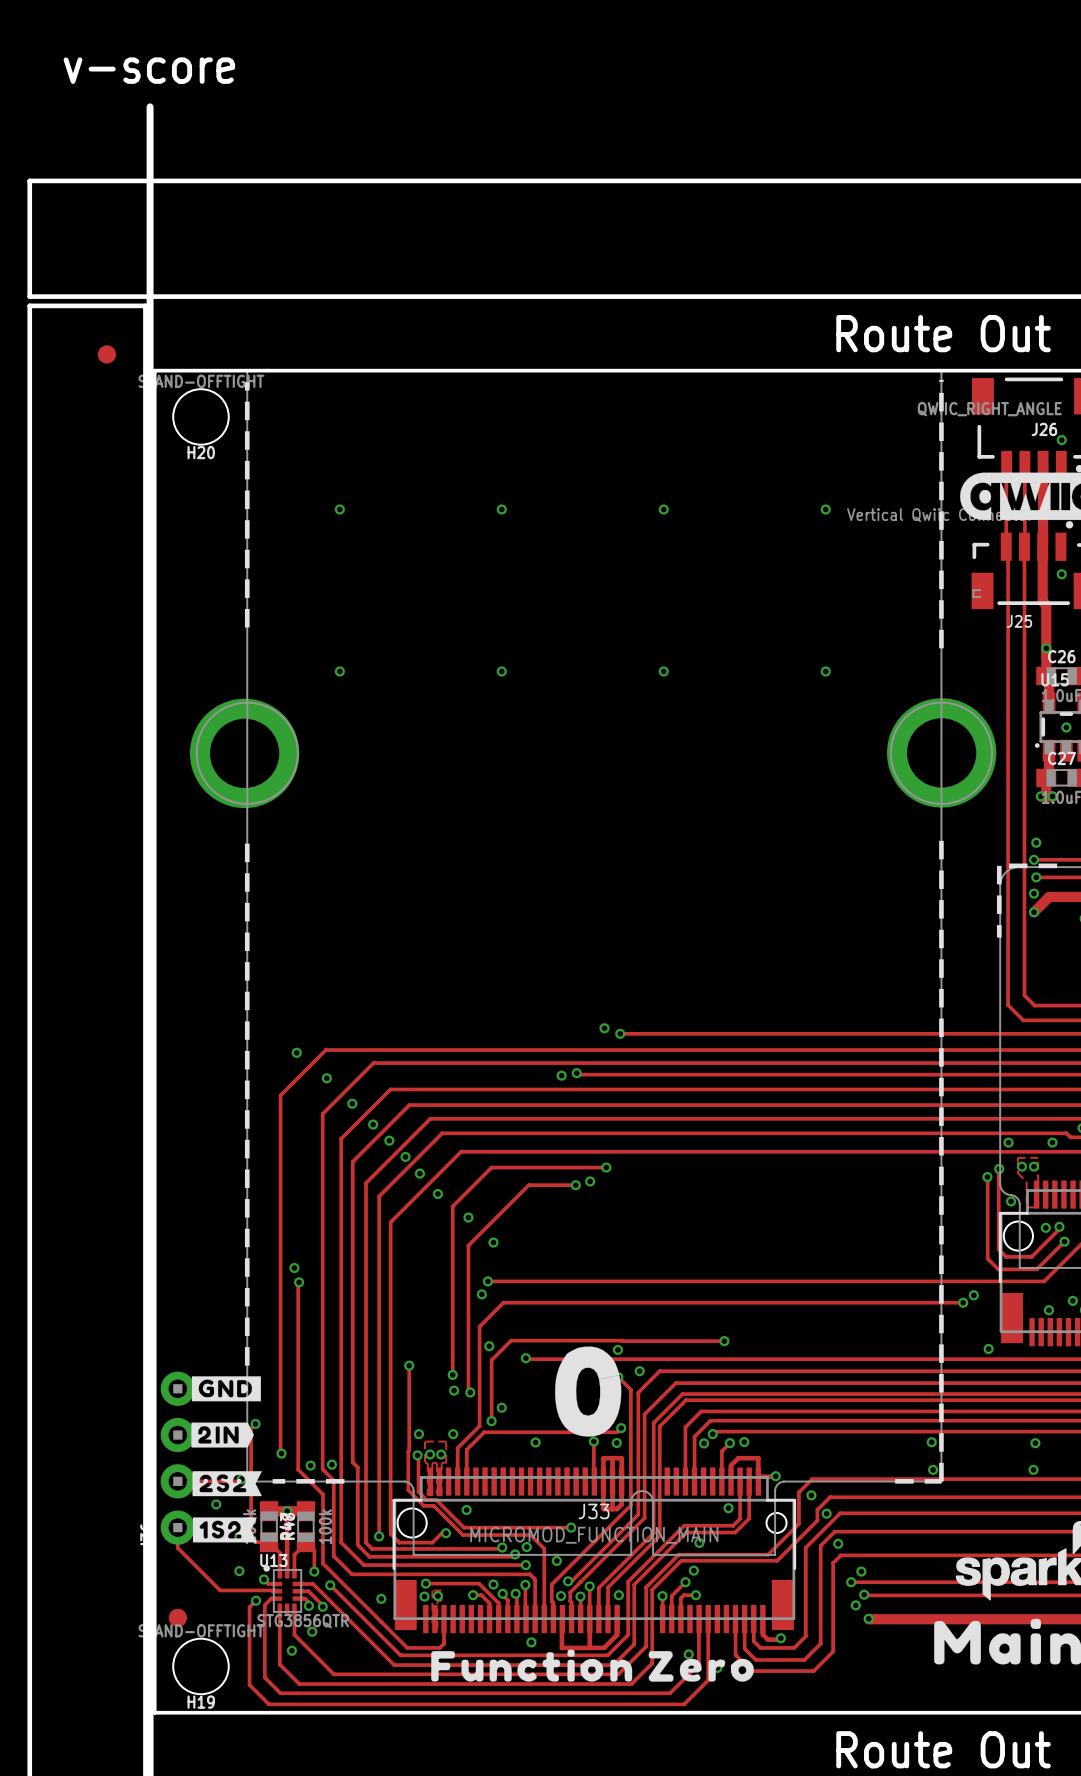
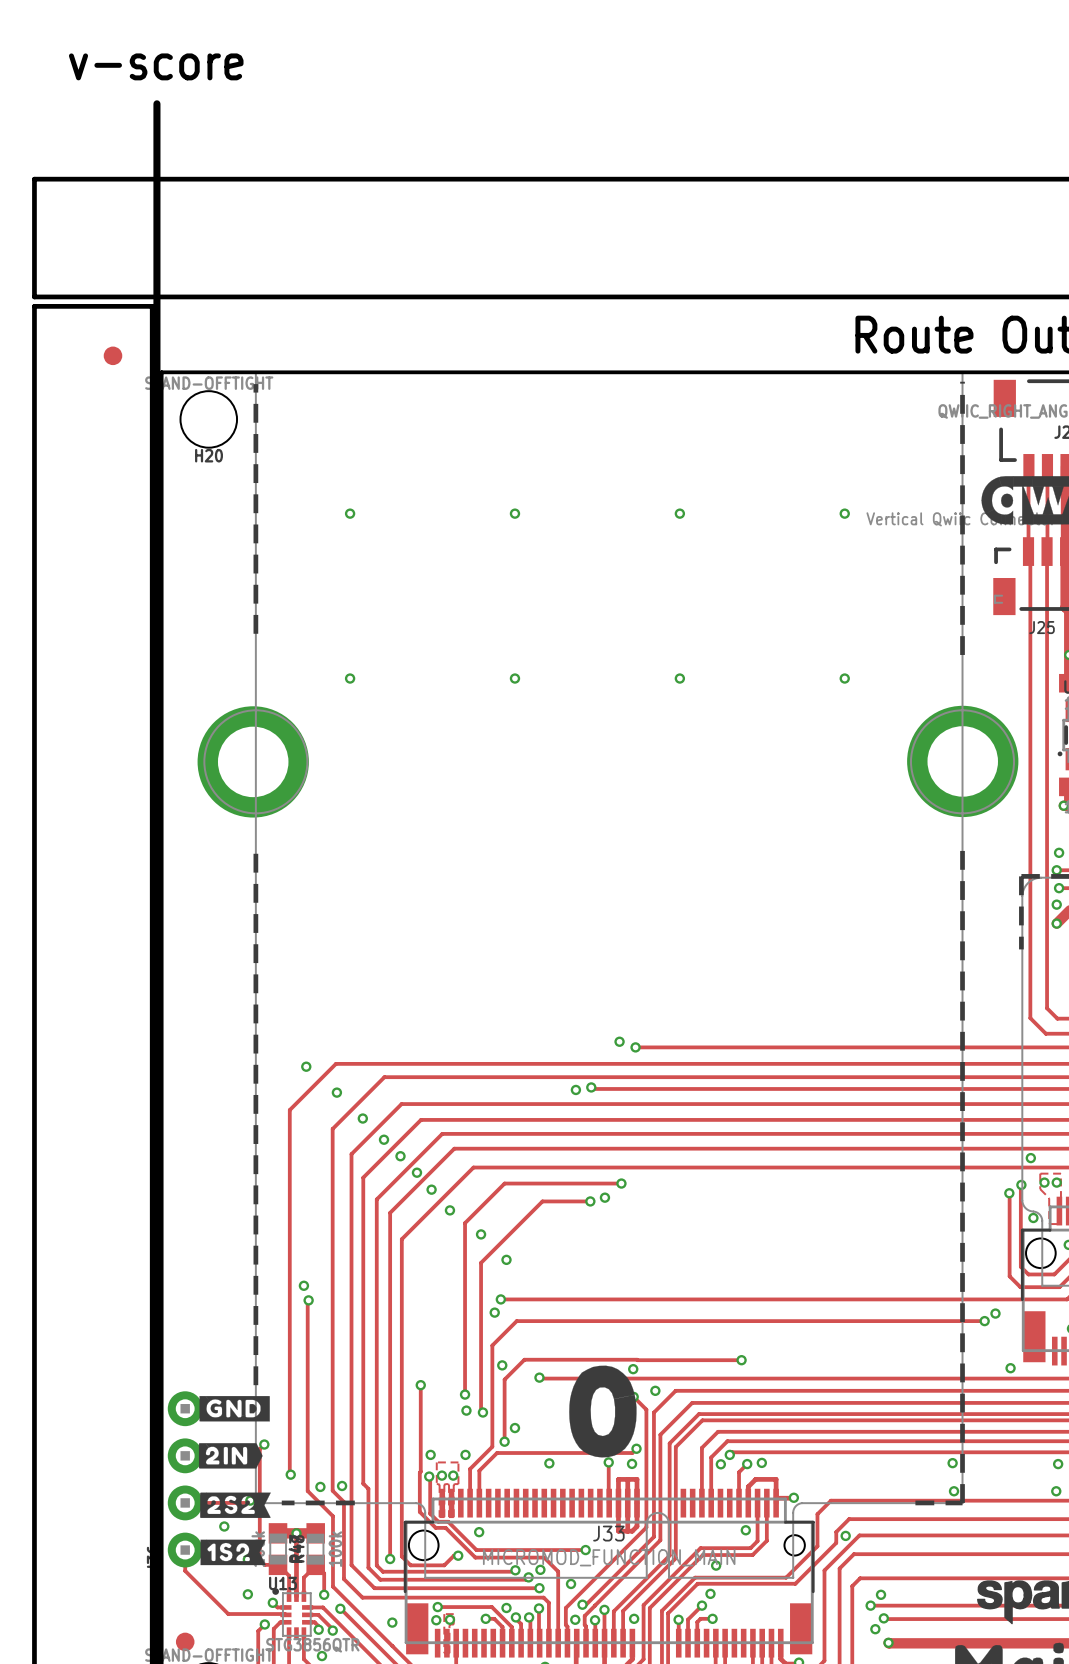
via: (811, 1495) -> none
via: (838, 1543) -> none

